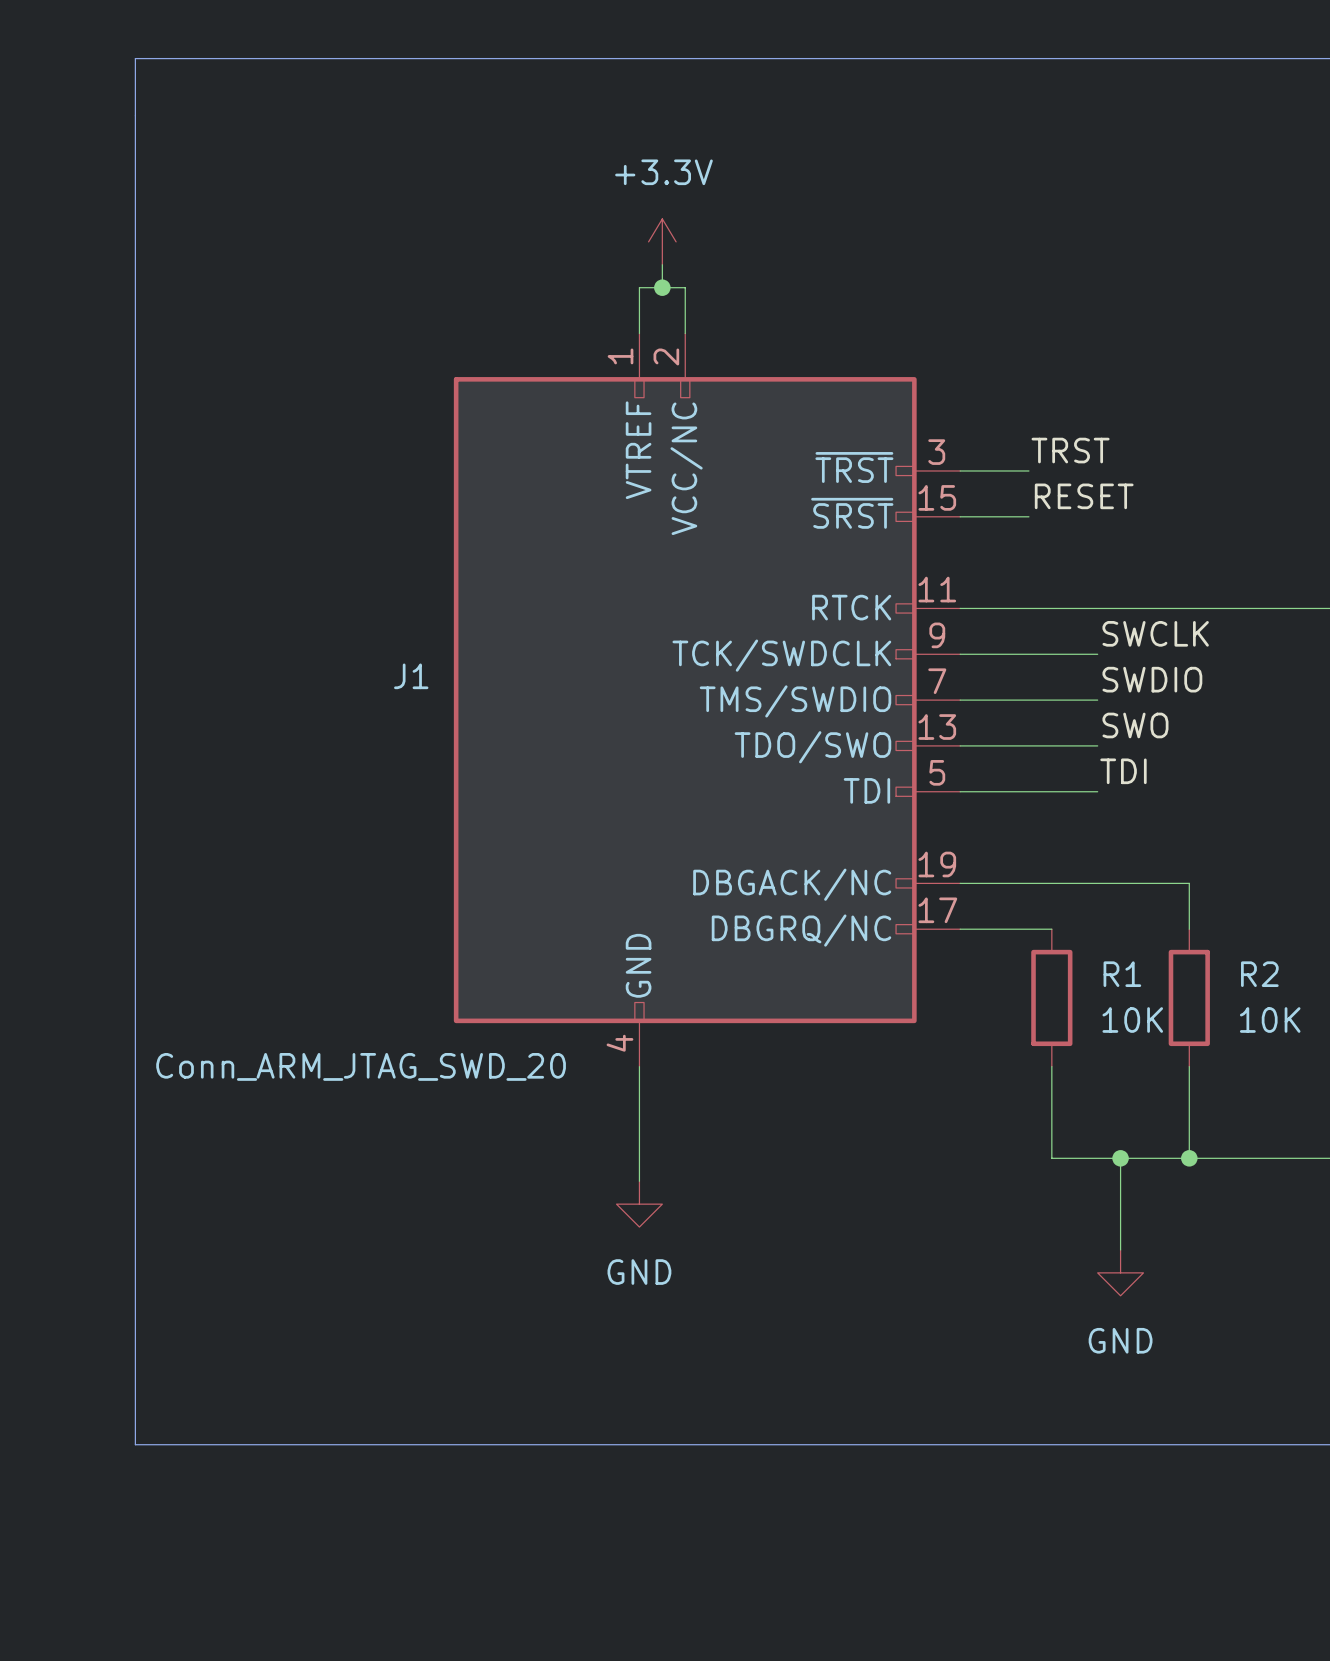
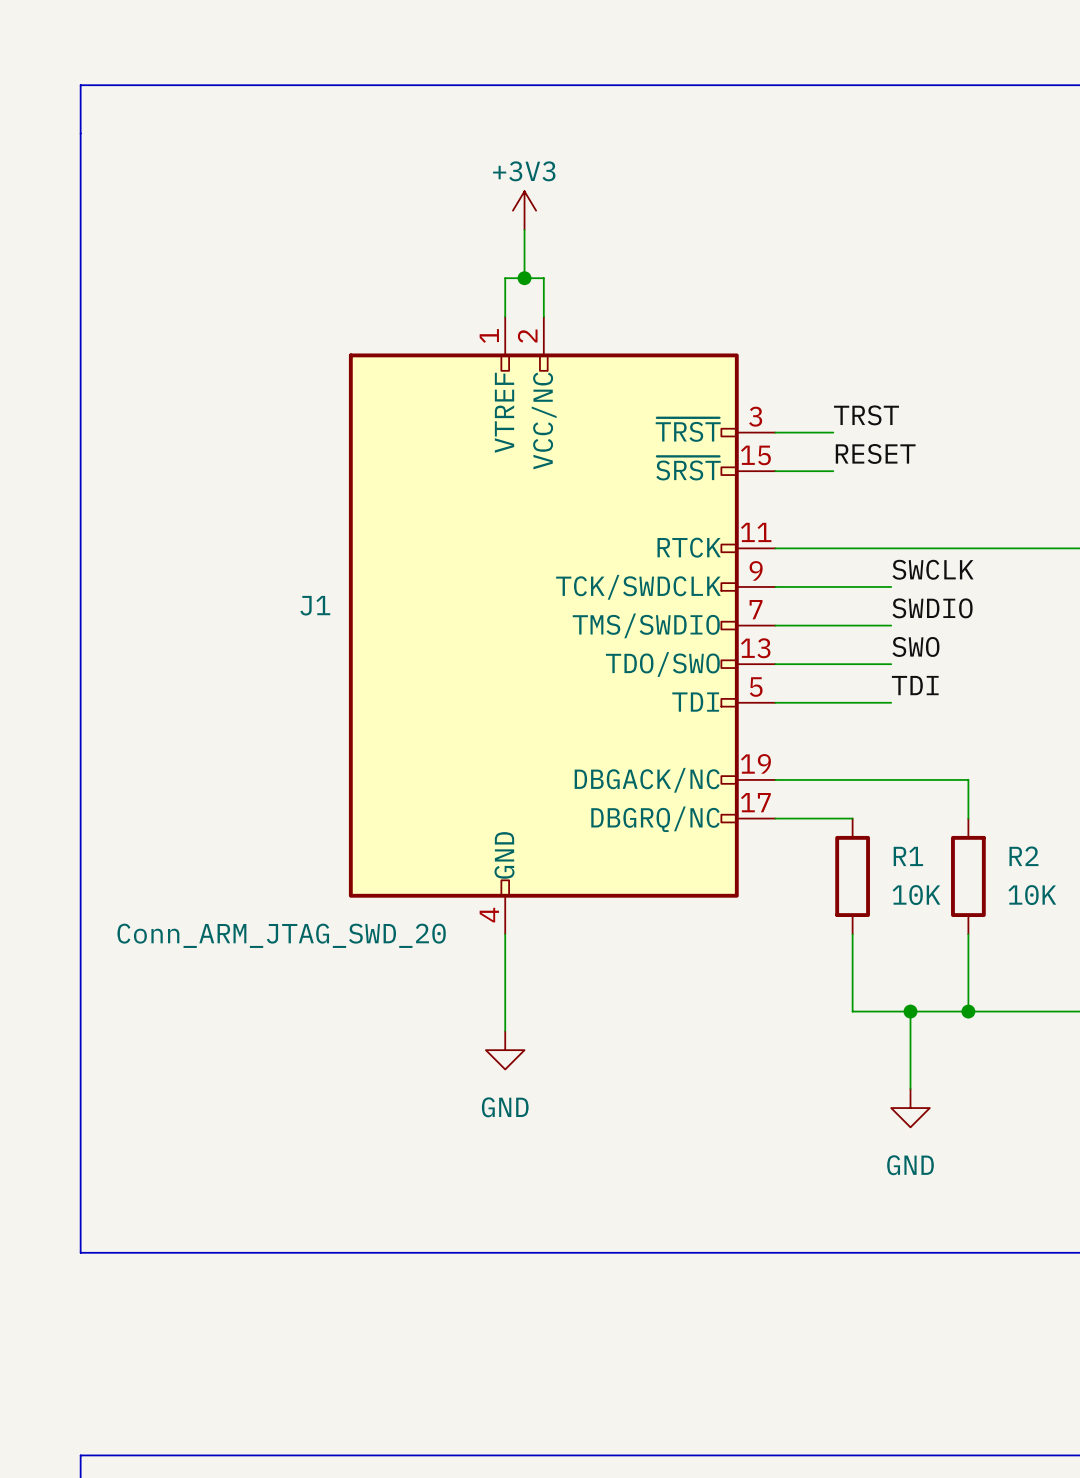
power symbol: none -> +3V3 (524, 210)
power symbol: +3.3V (662, 241) -> none

